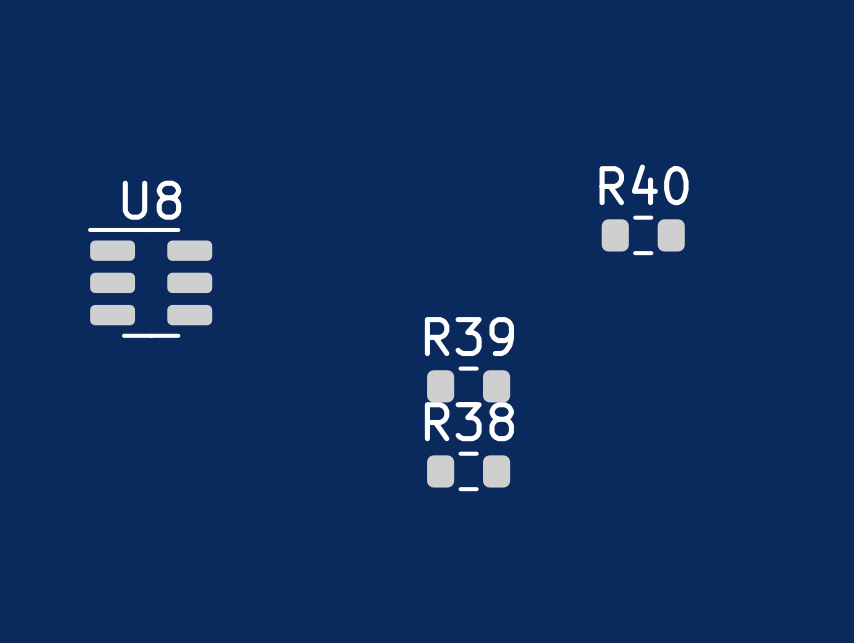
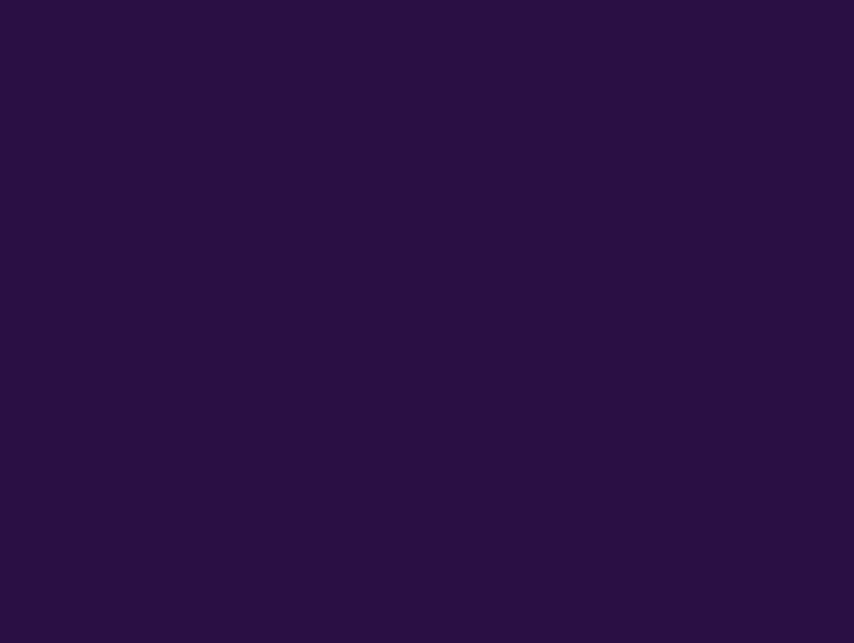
R40: (643, 235) -> none
U8: (150, 282) -> none
R39: (468, 386) -> none
R38: (468, 471) -> none

